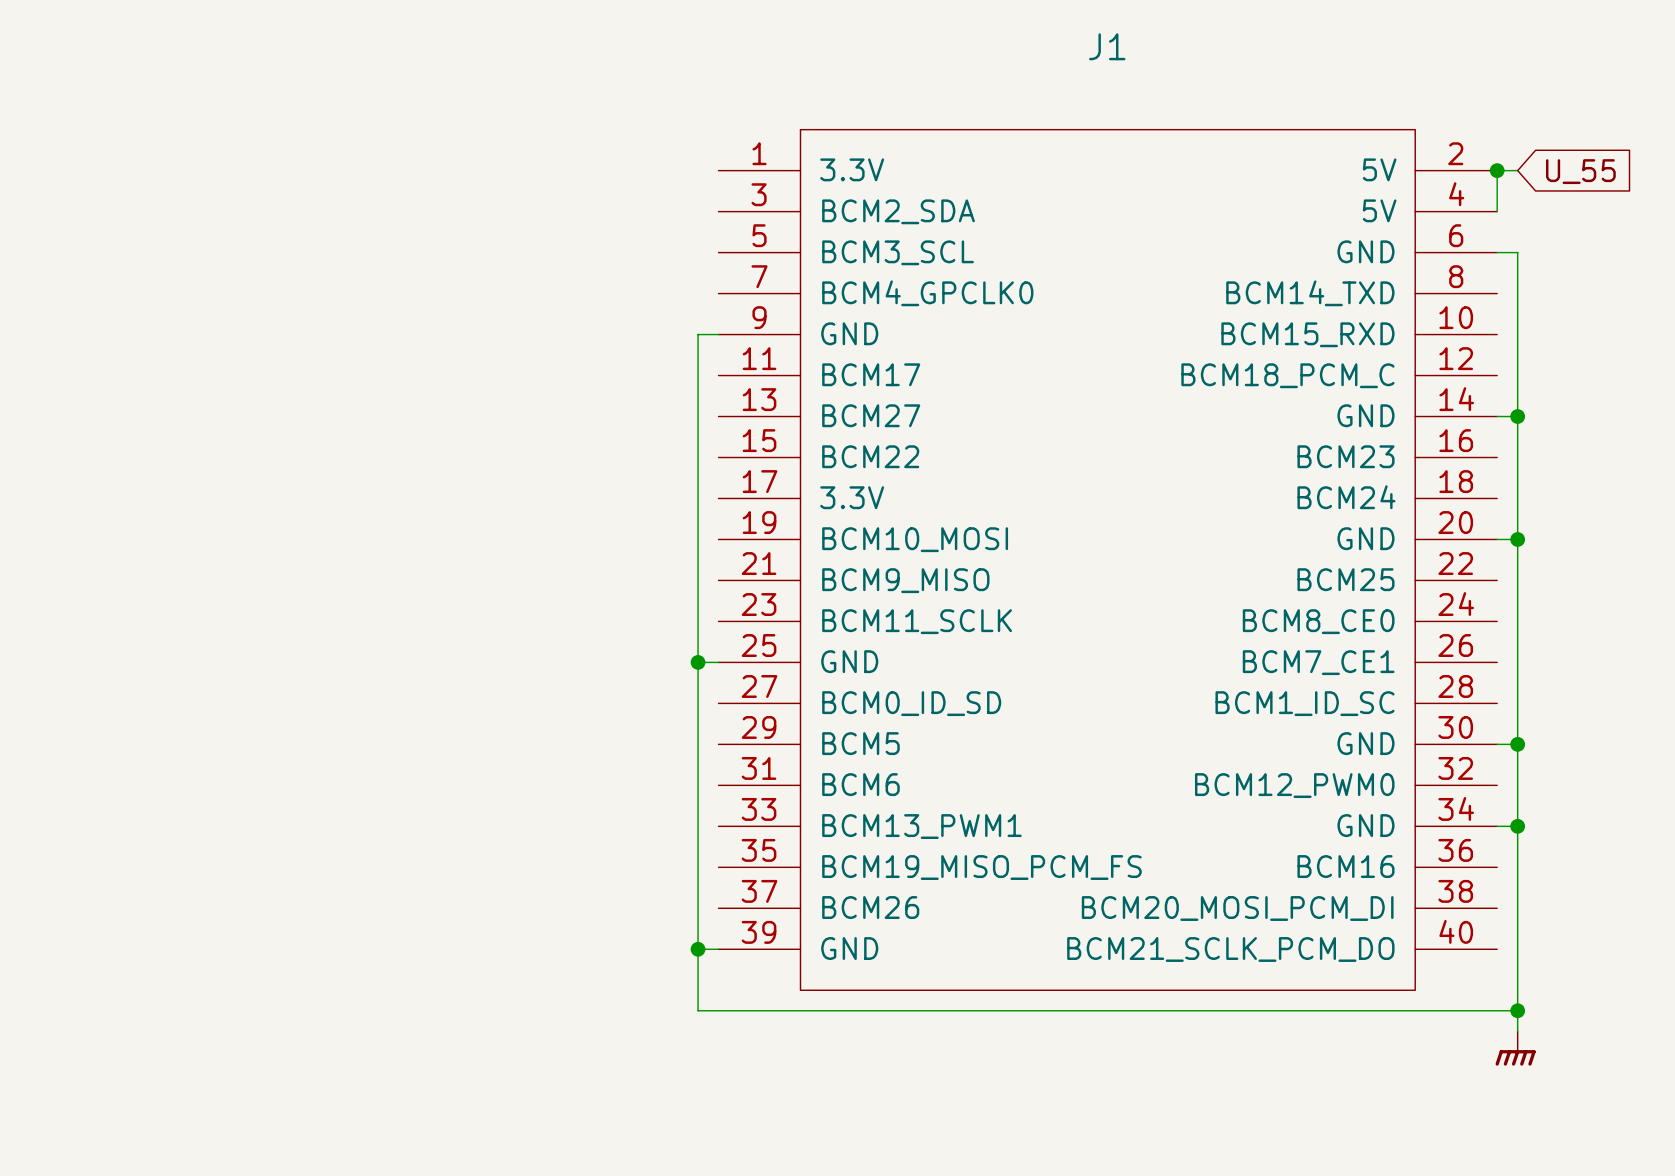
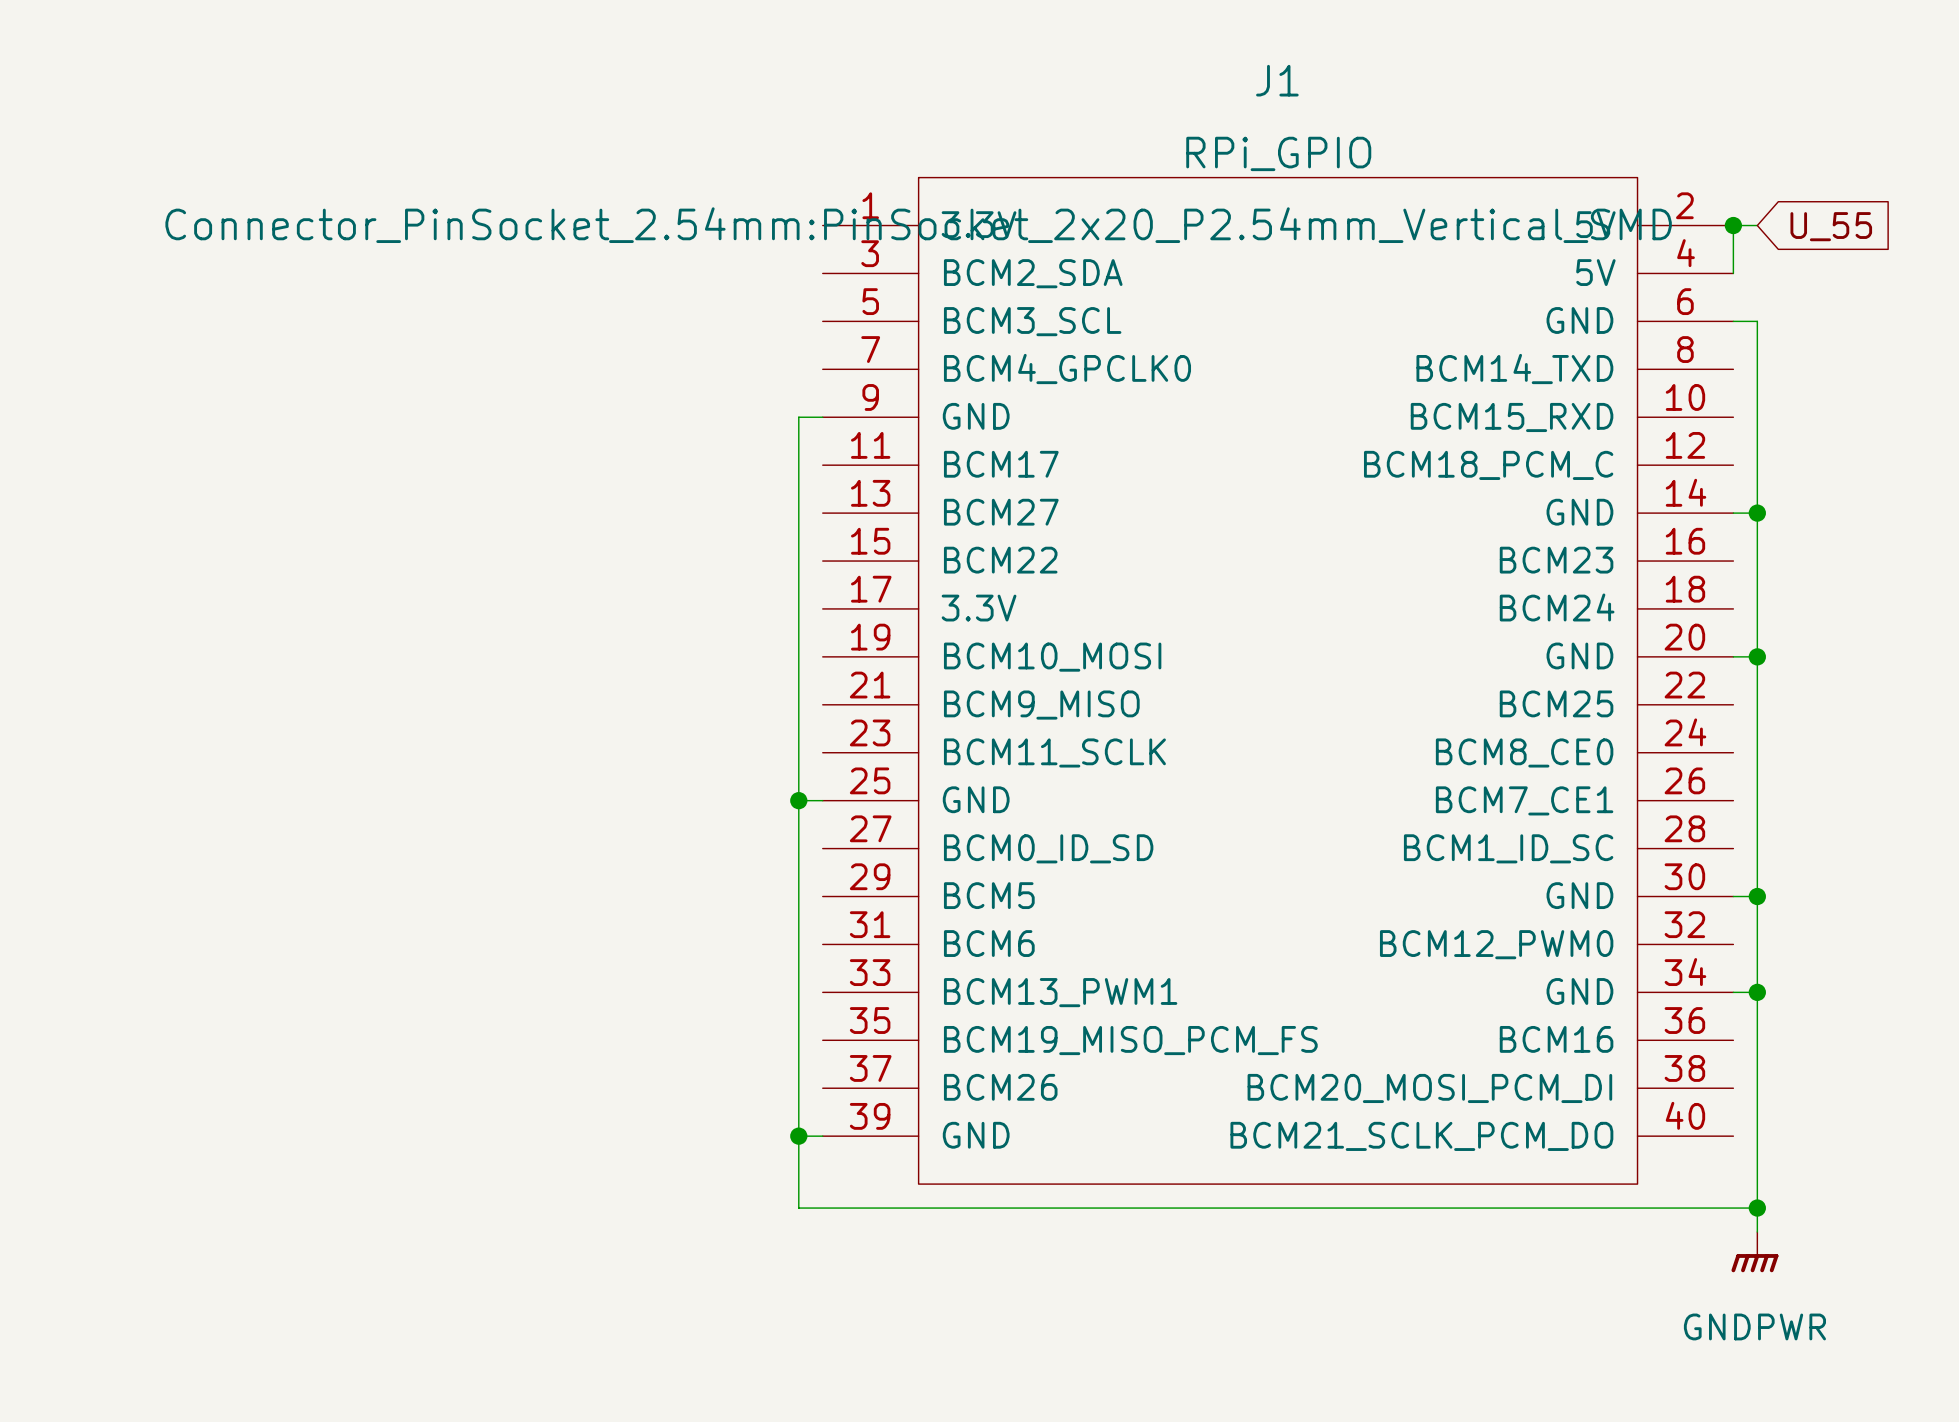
J1 value: none -> RPi_GPIO (1278, 153)
J1 text: none -> Connector_PinSocket_2.54mm:PinSocket_2x20_P2.54mm_Vertical_SMD (918, 225)
power symbol text: none -> GNDPWR (1754, 1326)

